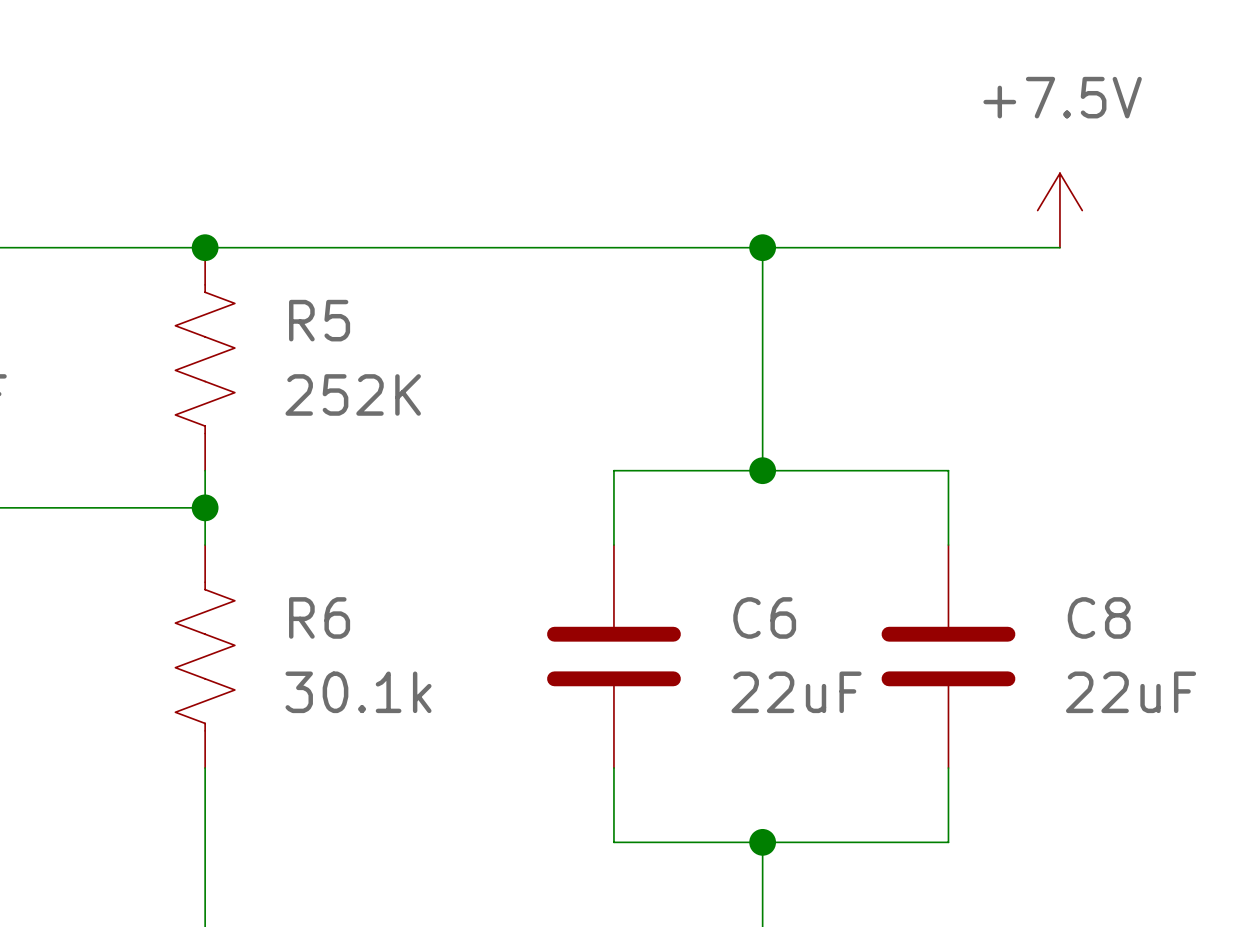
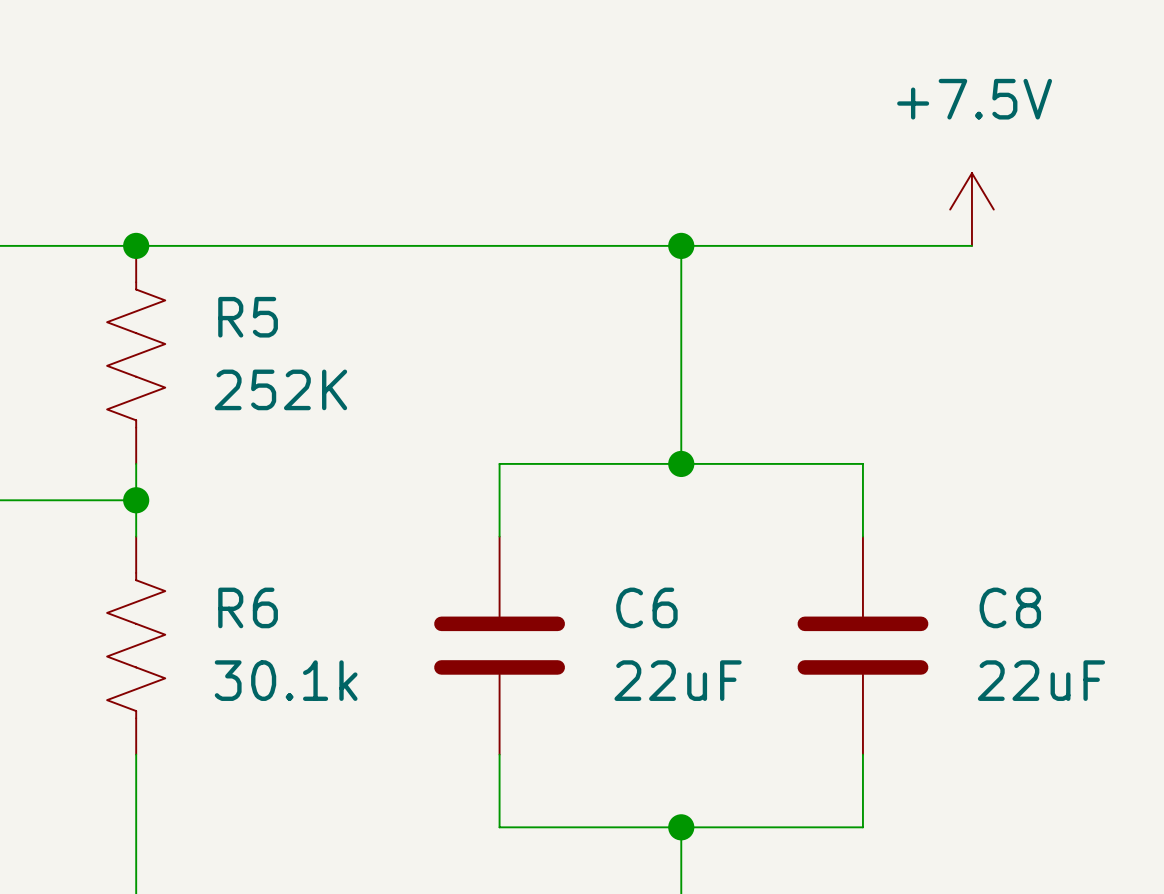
wire: (613, 470) (613, 545) -> (535, 463) (499, 463) (499, 536)
C6 position: (613, 656) -> (499, 645)
wire: (613, 768) (613, 842) -> (499, 754) (499, 827) (535, 827)

